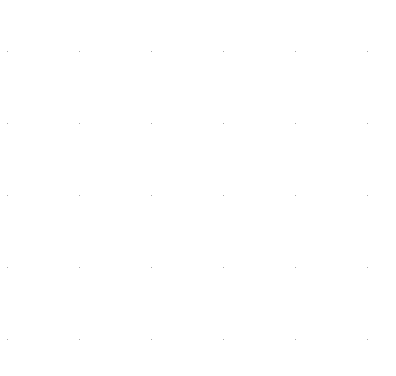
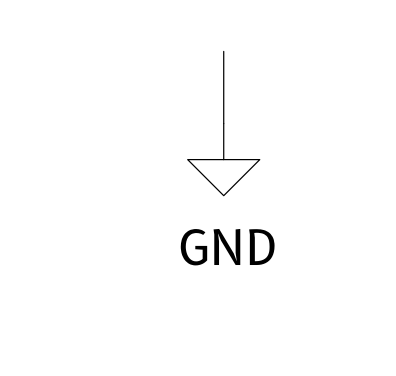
wire: none -> (223, 51) (223, 123)
power symbol: none -> GND (223, 159)

